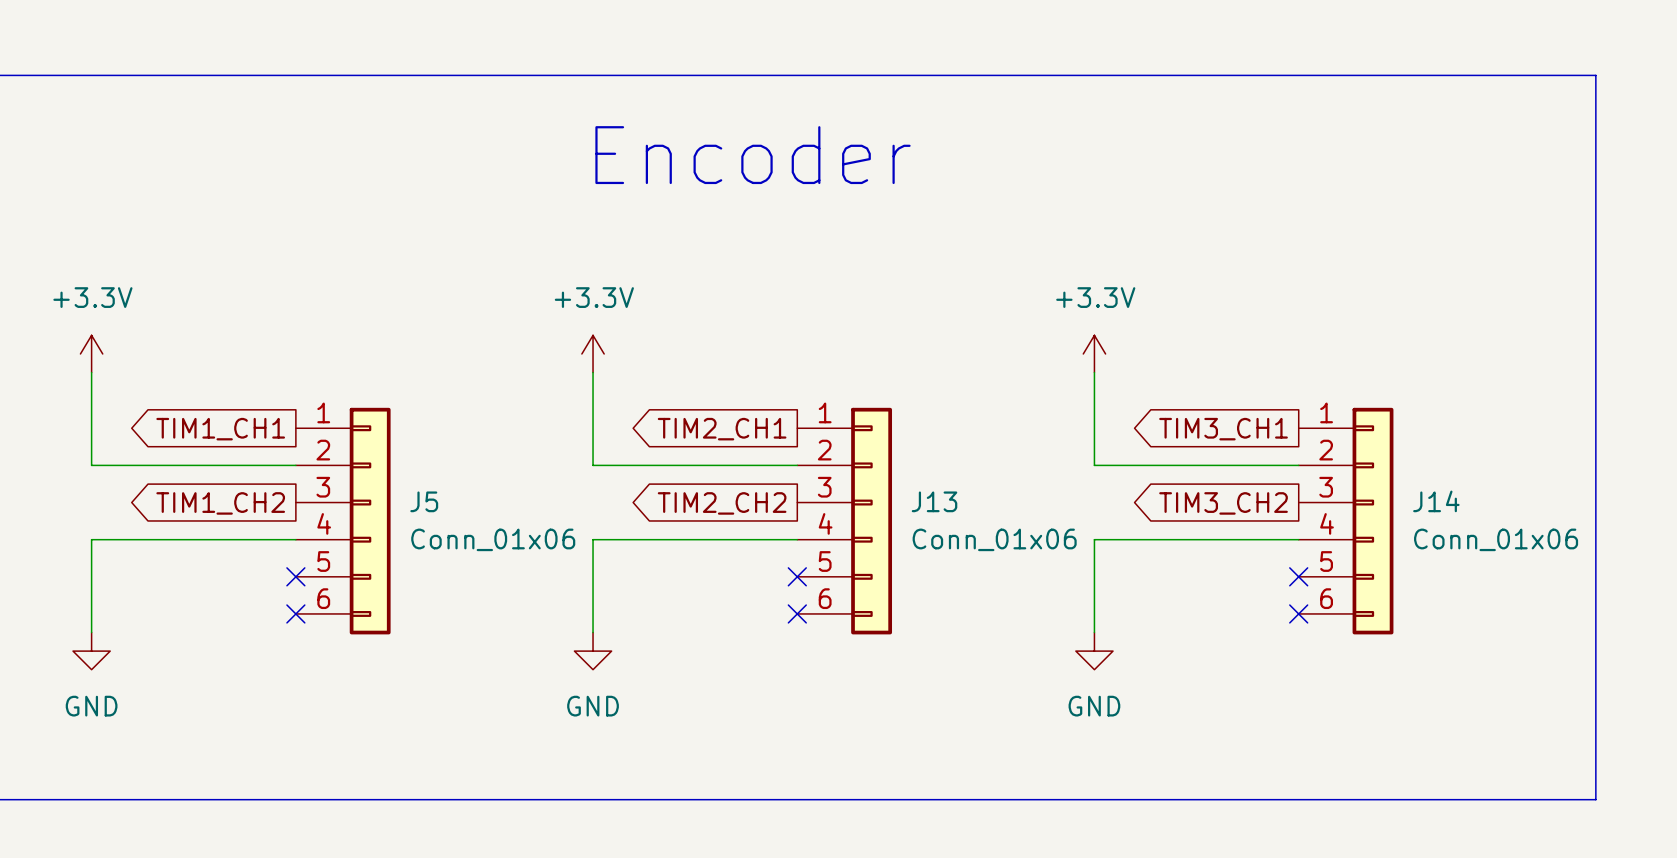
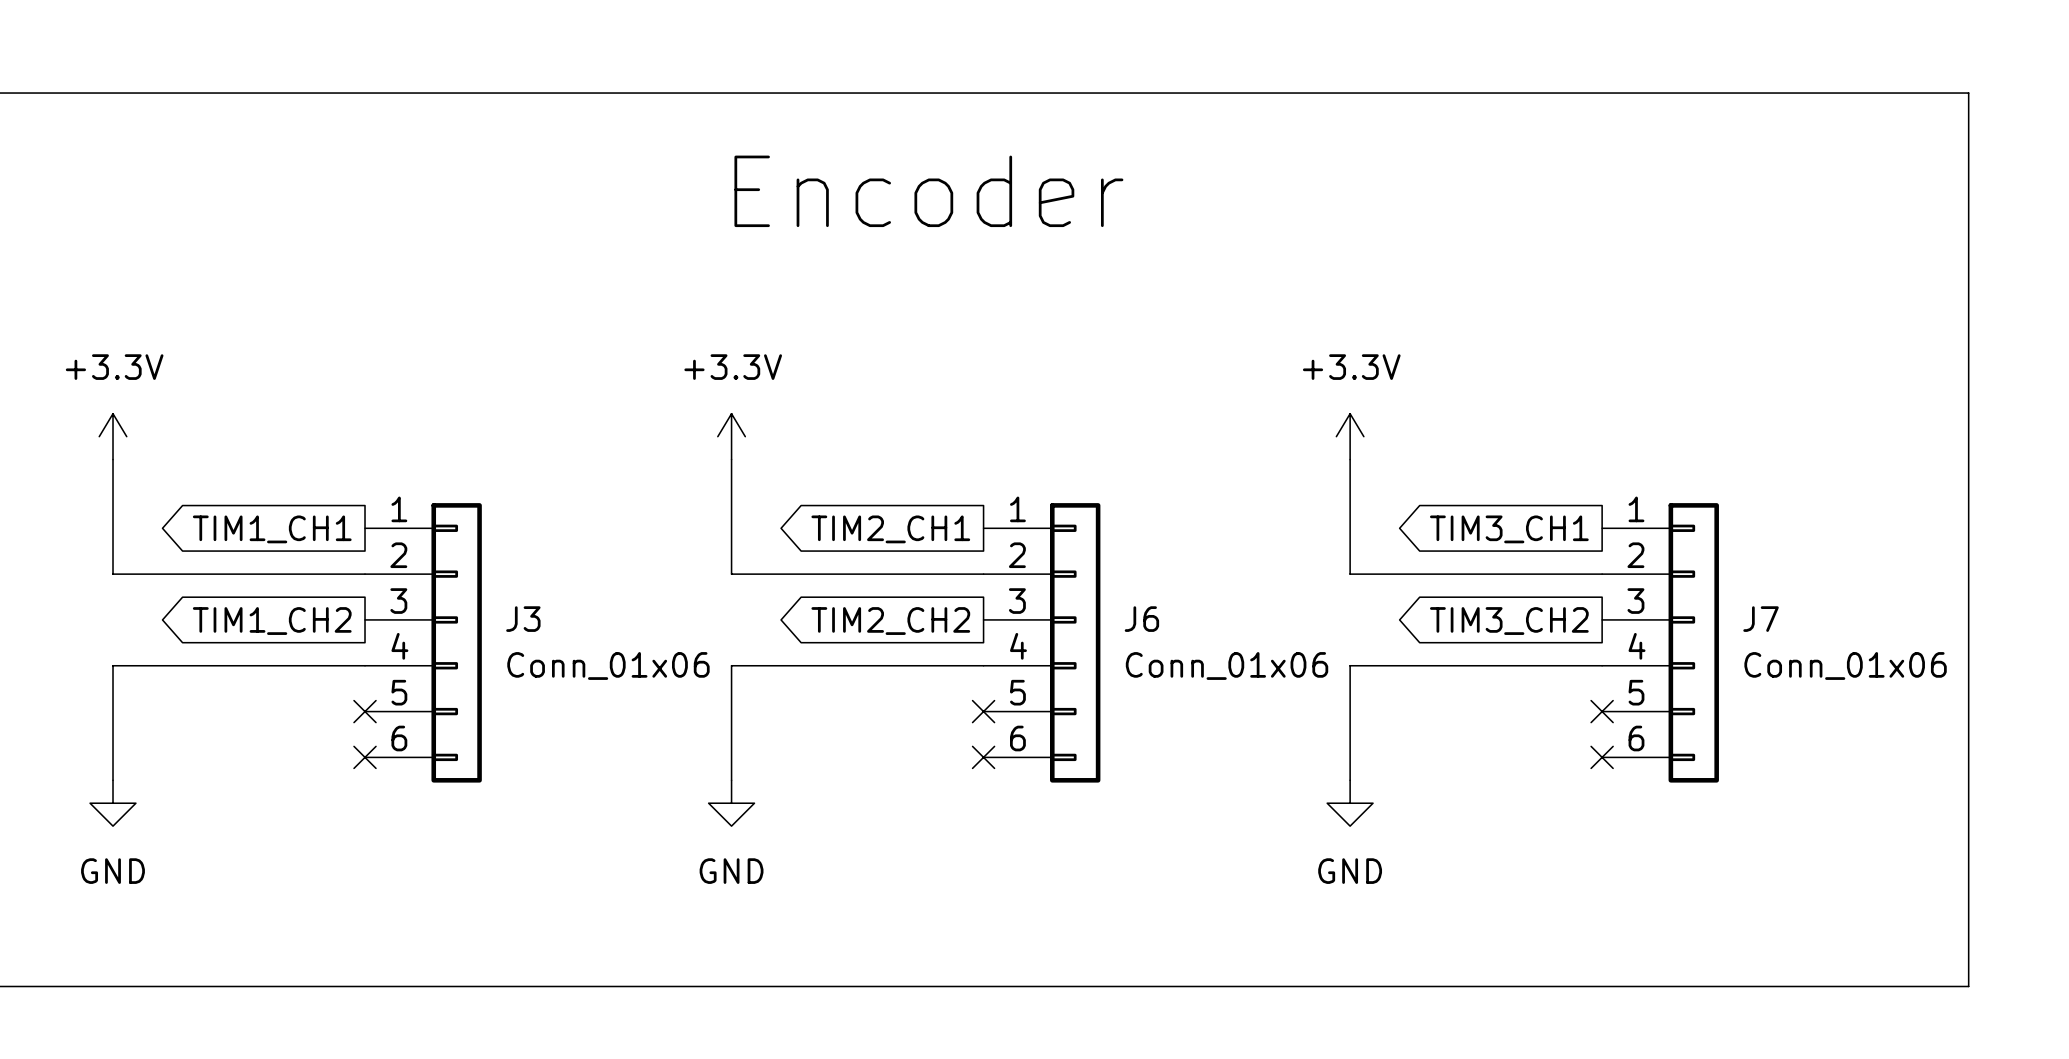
J5 name: J5 (424, 501) -> J3 (523, 619)
J13 name: J13 (934, 501) -> J6 (1141, 619)
J14 name: J14 (1436, 501) -> J7 (1761, 619)

